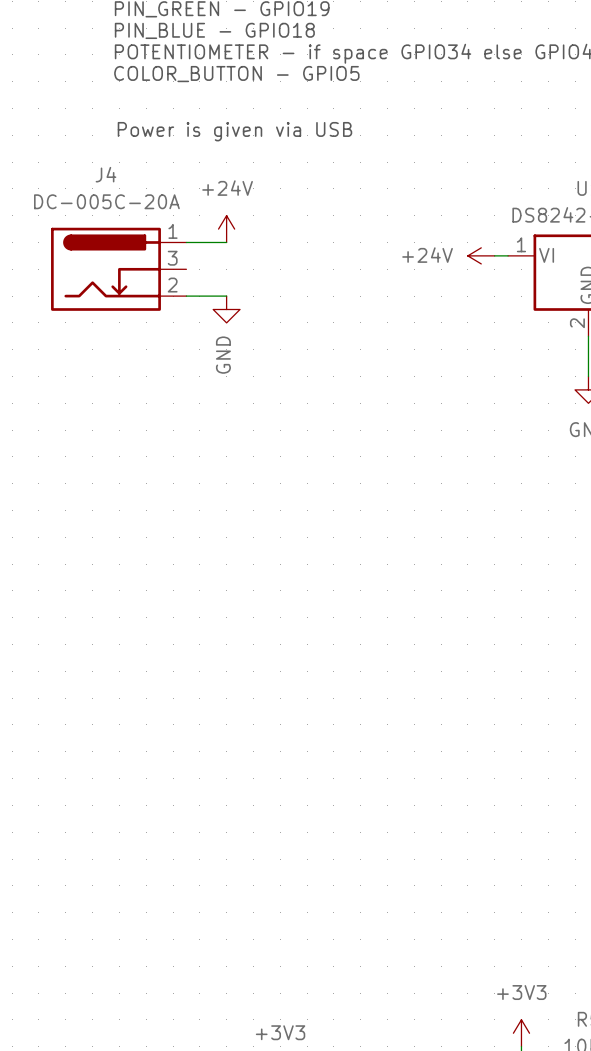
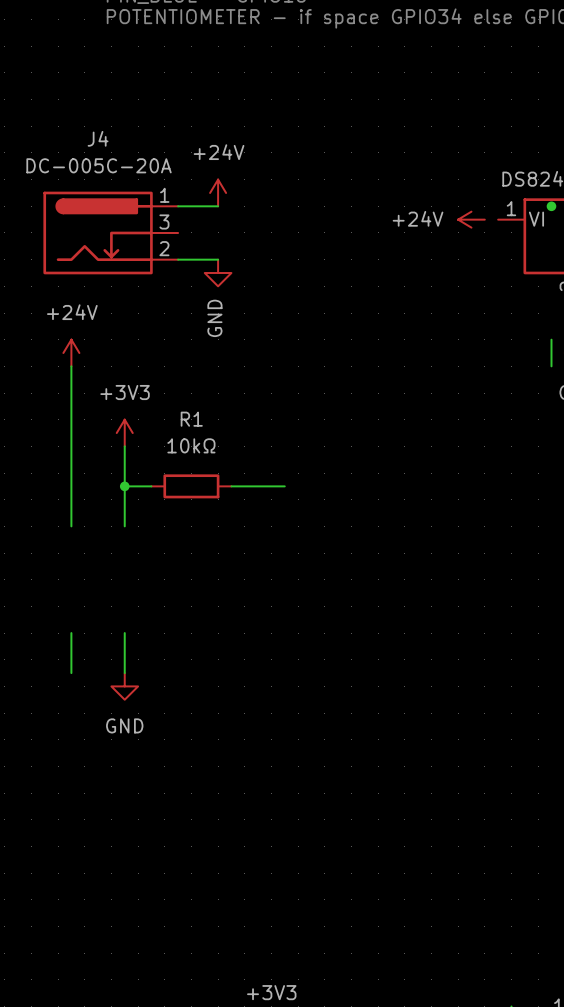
text: COLOR_BUTTON - GPIO5 (236, 74) -> none
text: Power is given via USB (234, 131) -> none
junction: none -> (551, 206)
wire: (494, 255) (508, 255) -> none
wire: none -> (551, 339) (551, 366)
power symbol: none -> +24V (71, 353)
wire: none -> (71, 366) (71, 526)
power symbol: none -> +3V3 (124, 433)
wire: none -> (124, 446) (124, 526)
wire: none -> (124, 486) (151, 486)
junction: none -> (124, 486)
R1: none -> 10kΩ (191, 486)
wire: none -> (231, 486) (284, 486)
wire: none -> (71, 633) (71, 673)
wire: none -> (124, 633) (124, 673)
power symbol: none -> GND (124, 686)
power symbol: +3V3 (521, 1033) -> none

